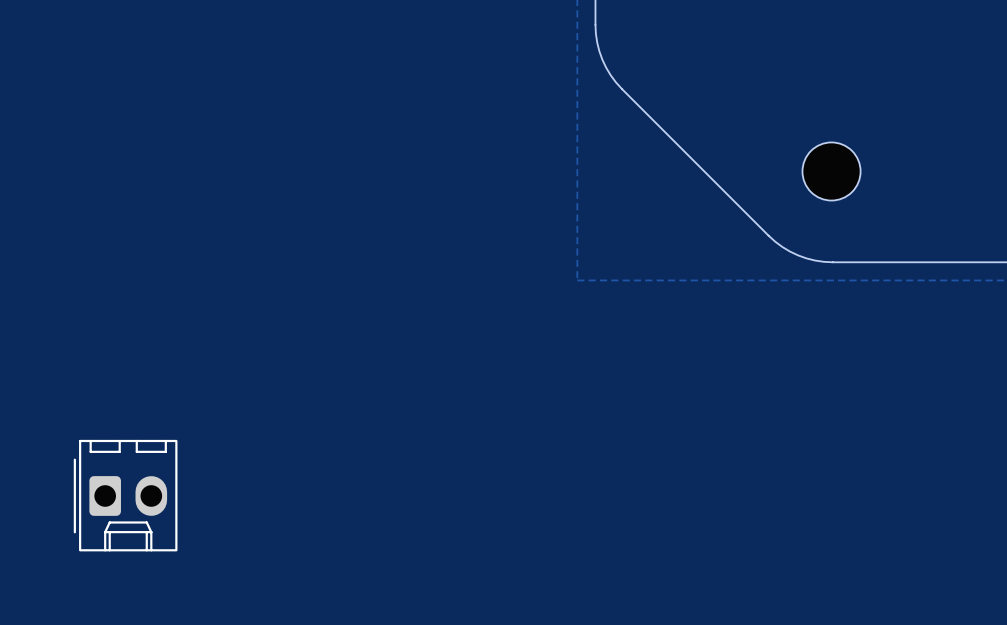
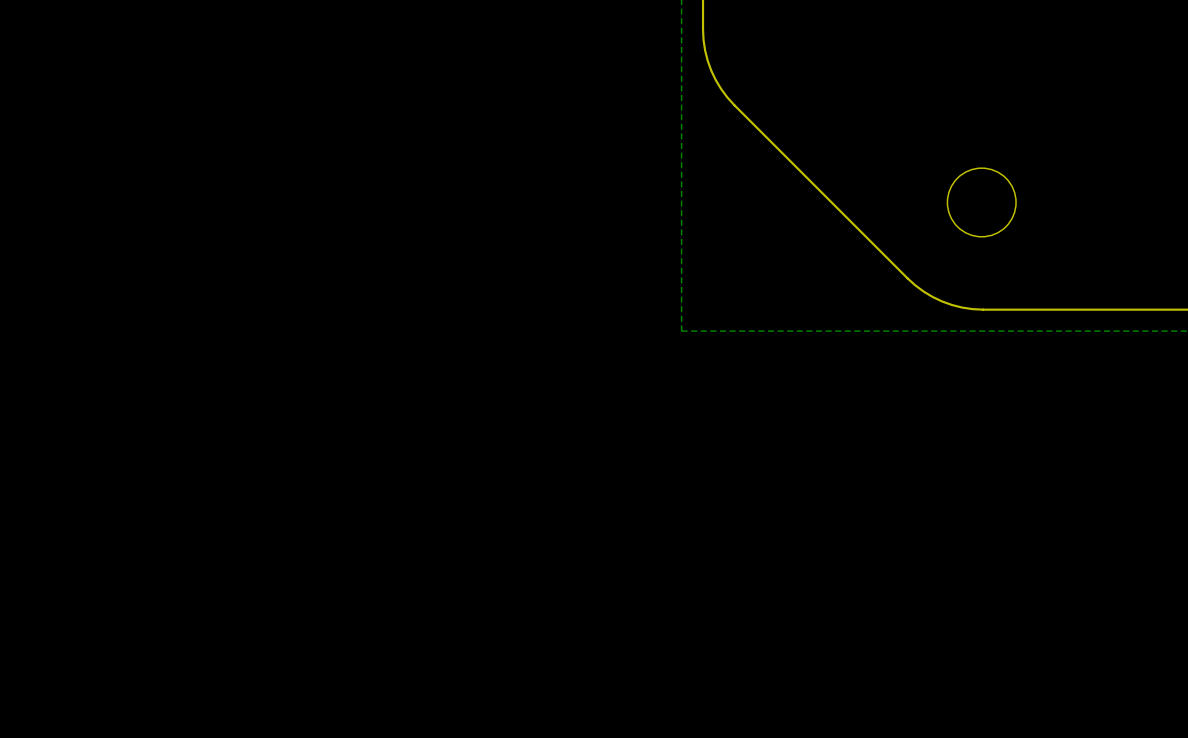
part: (125, 495) -> none

